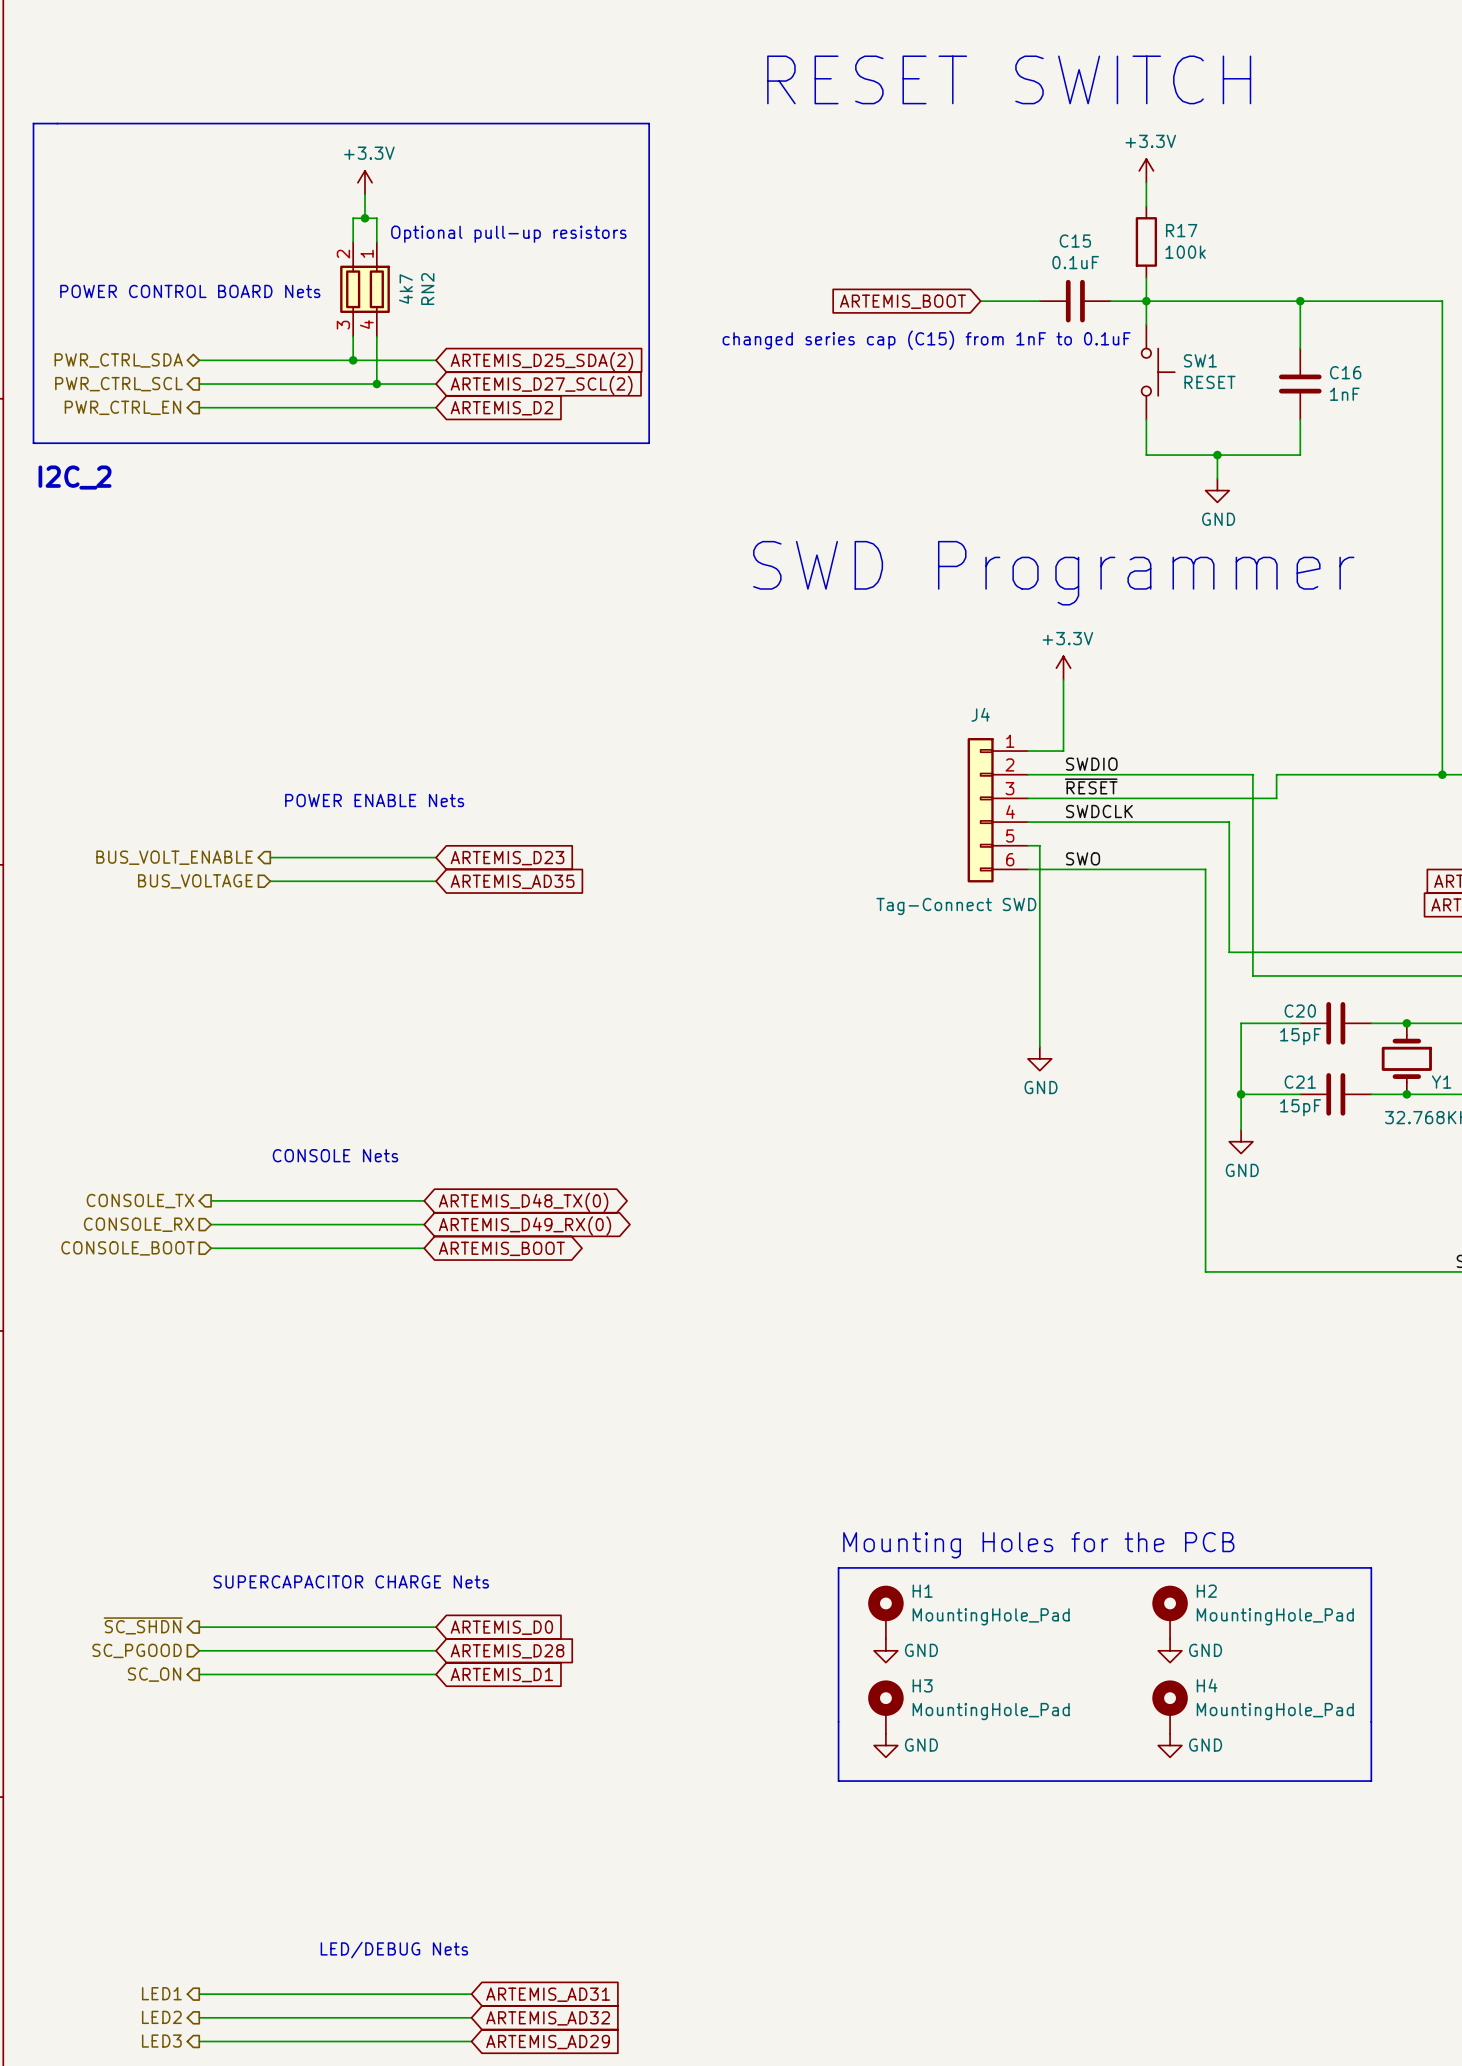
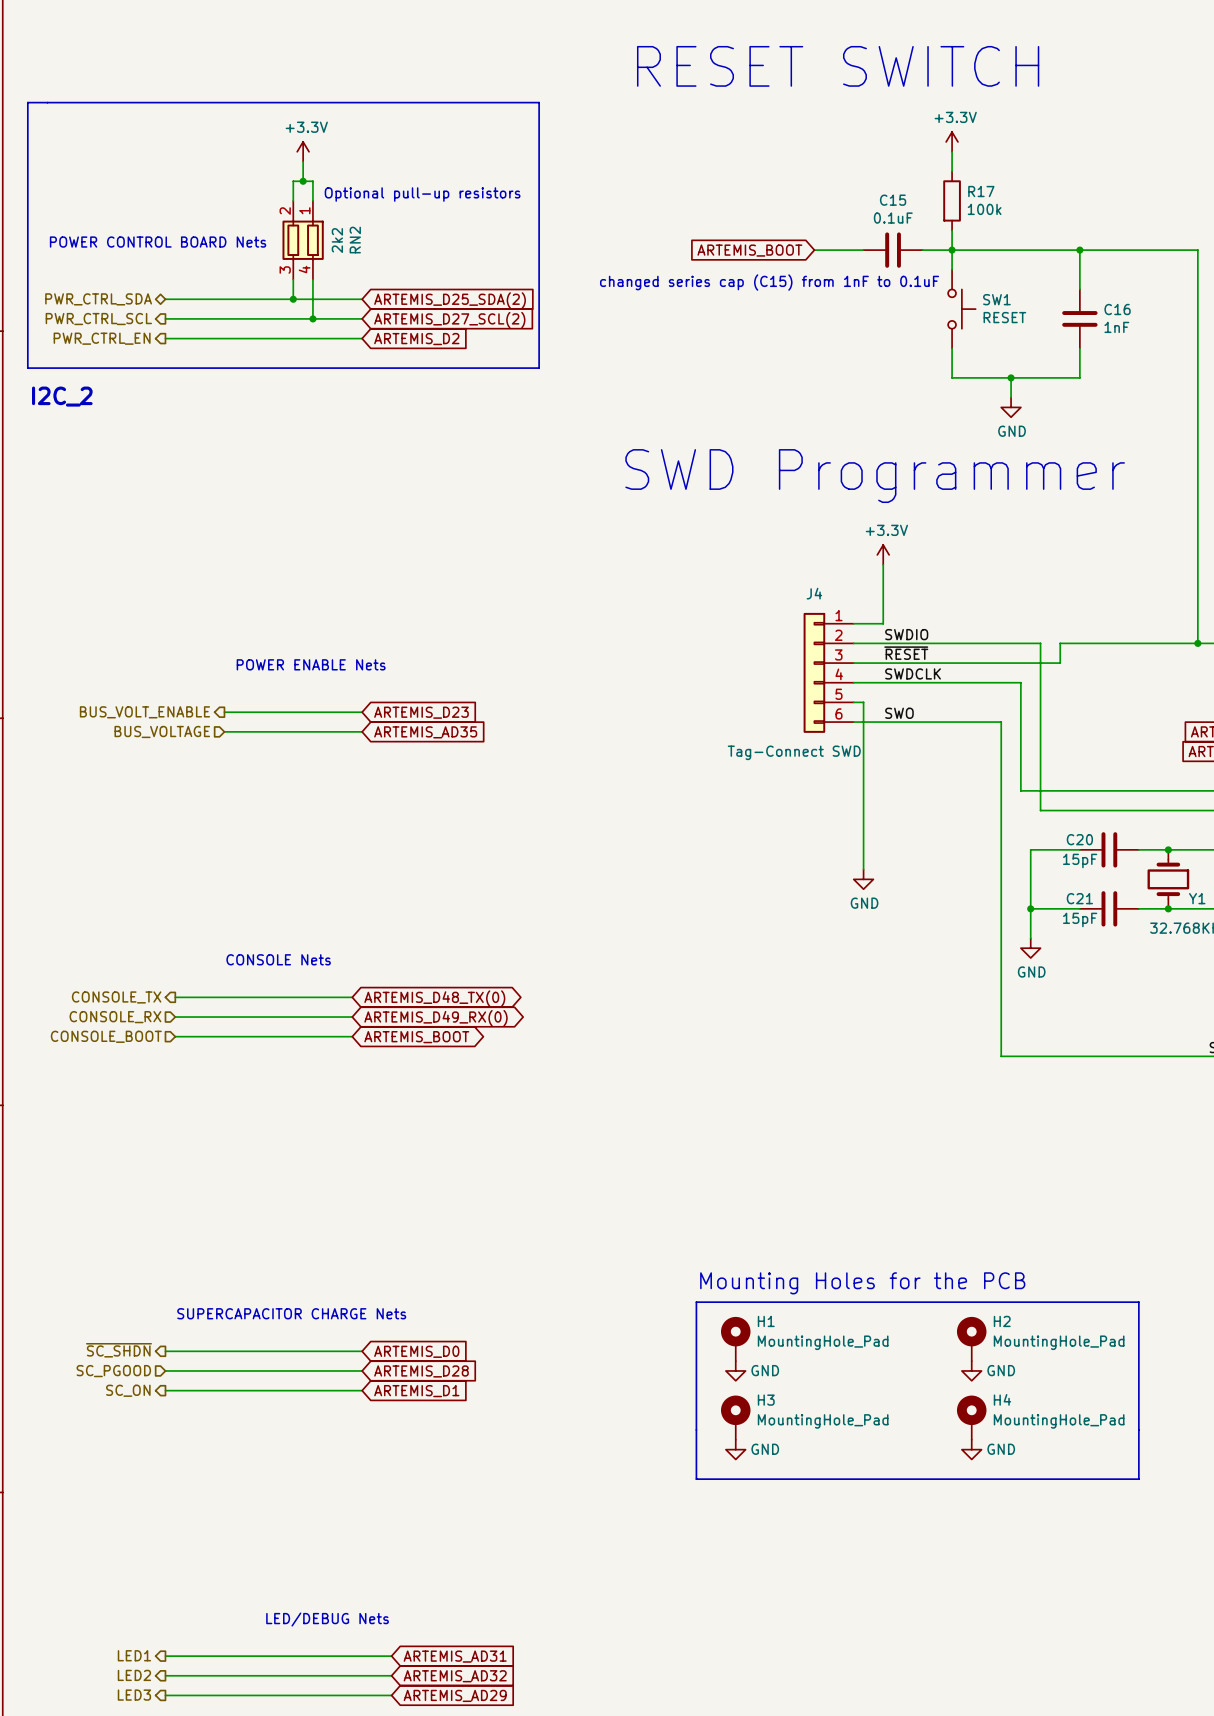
RN2 value: 4k7 (405, 289) -> 2k2 (337, 240)

